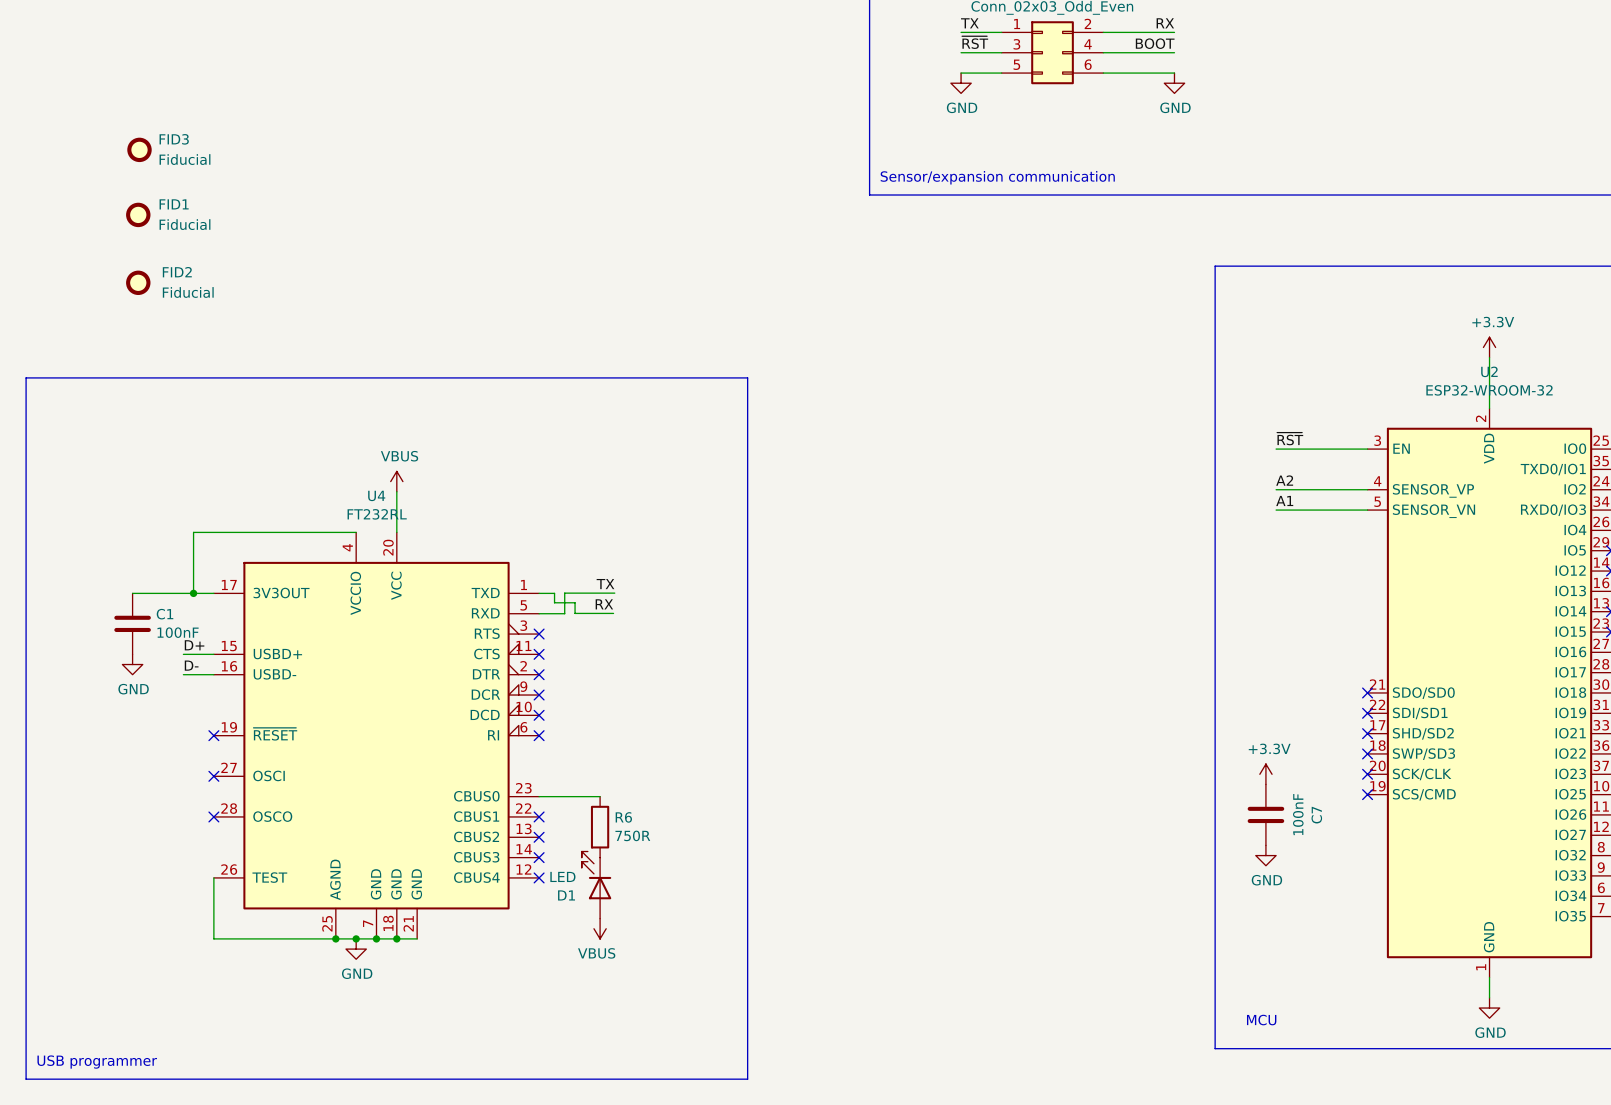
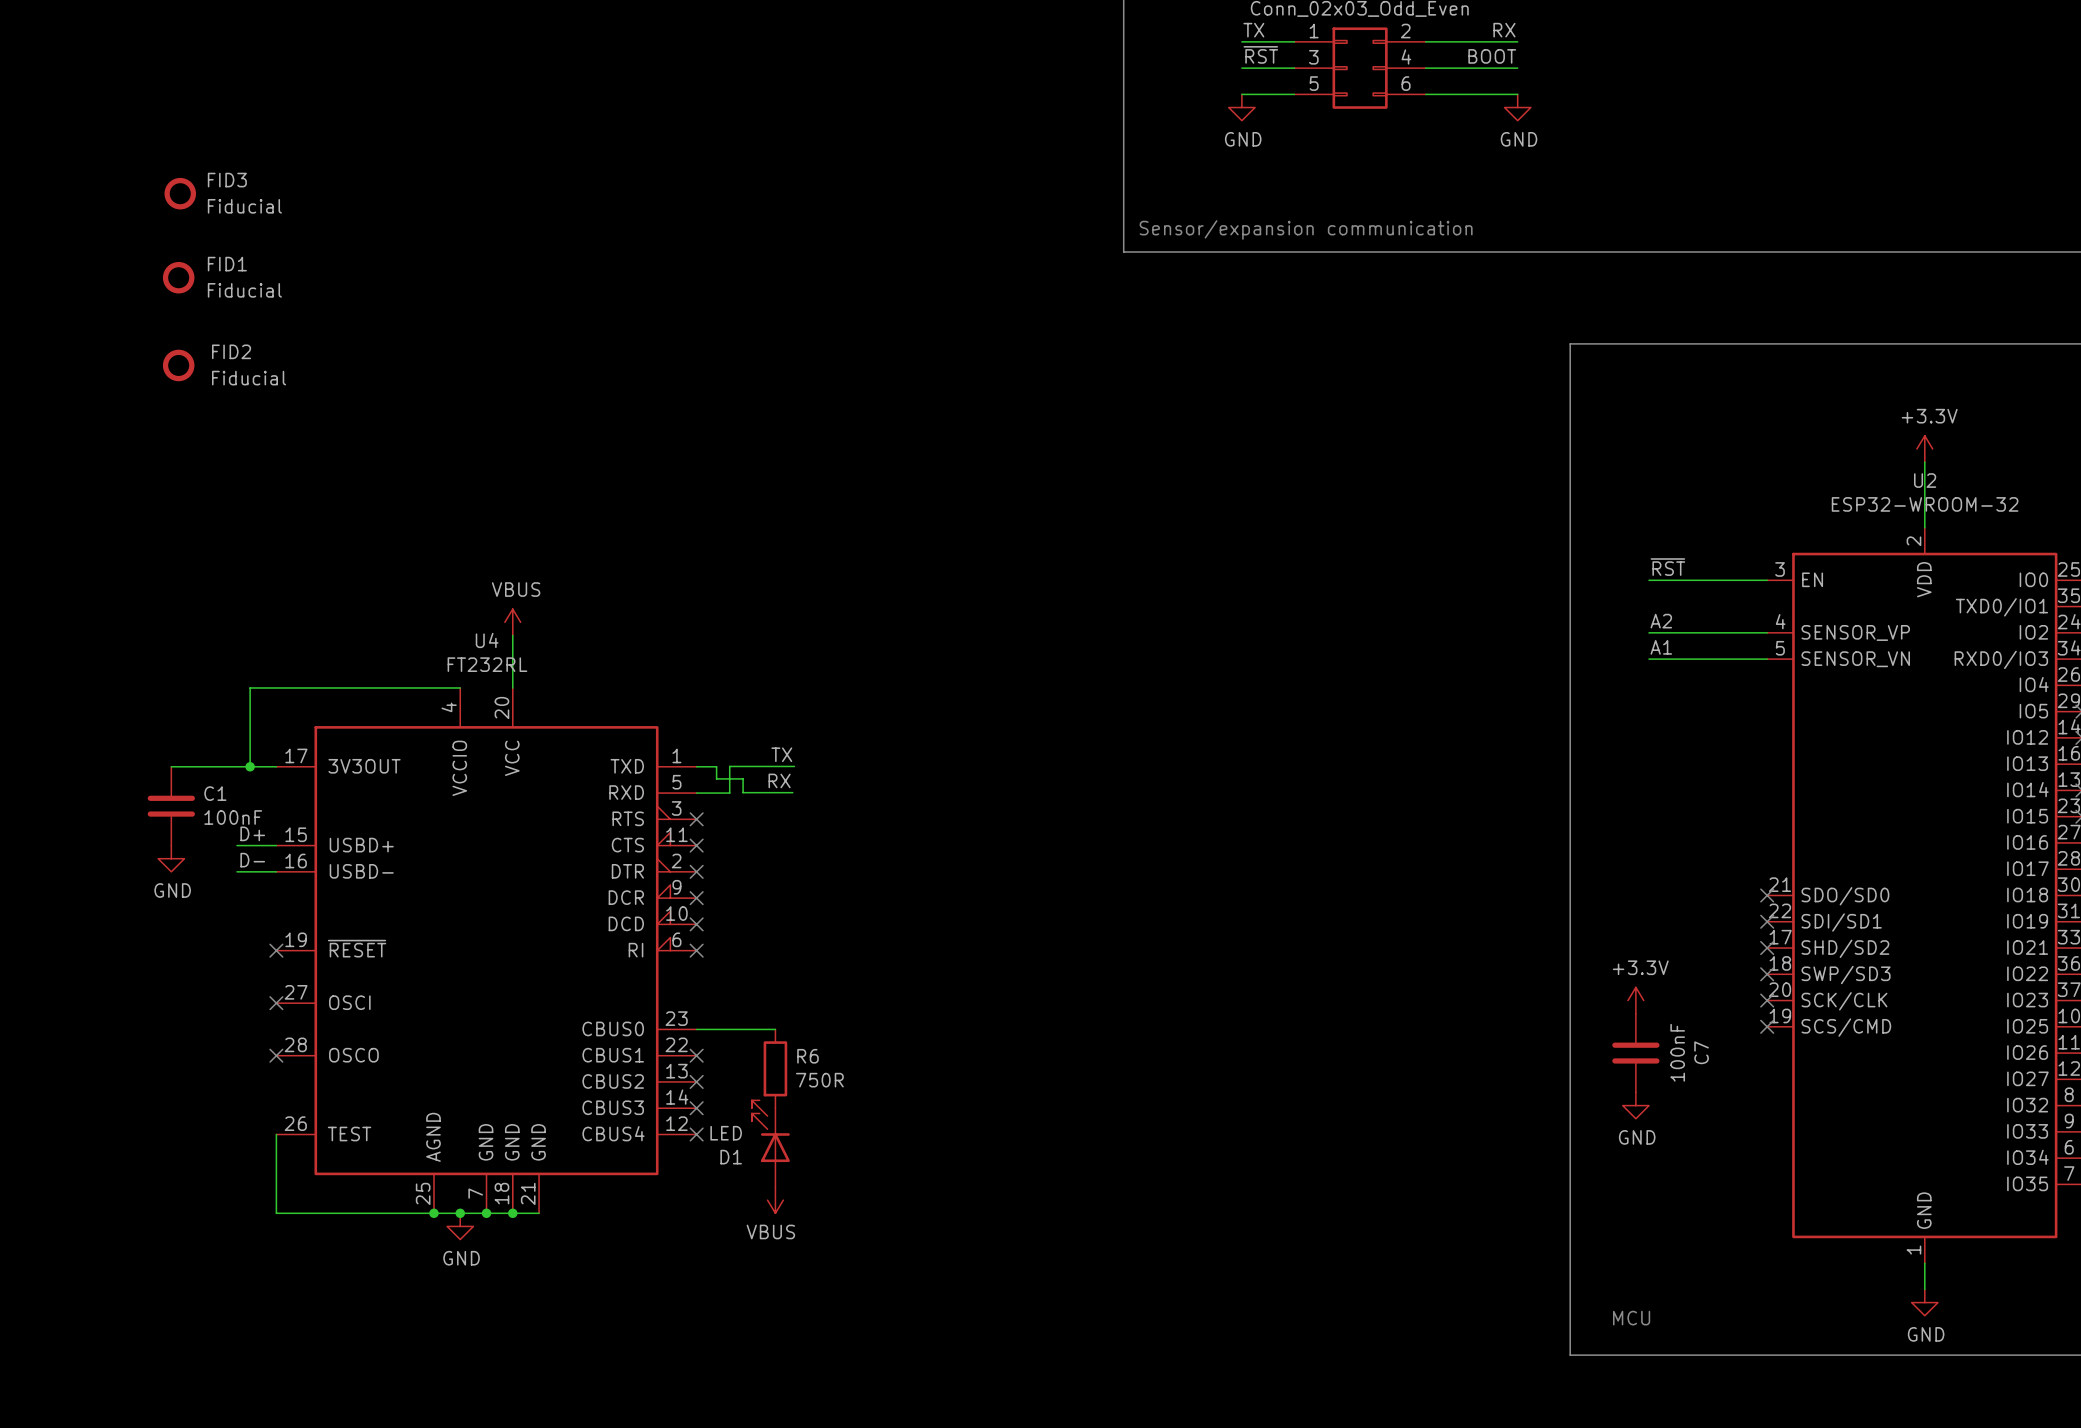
line: (26, 377) (747, 377) (747, 1079) (26, 1079) (26, 377) -> none
text: USB programmer (97, 1062) -> none

